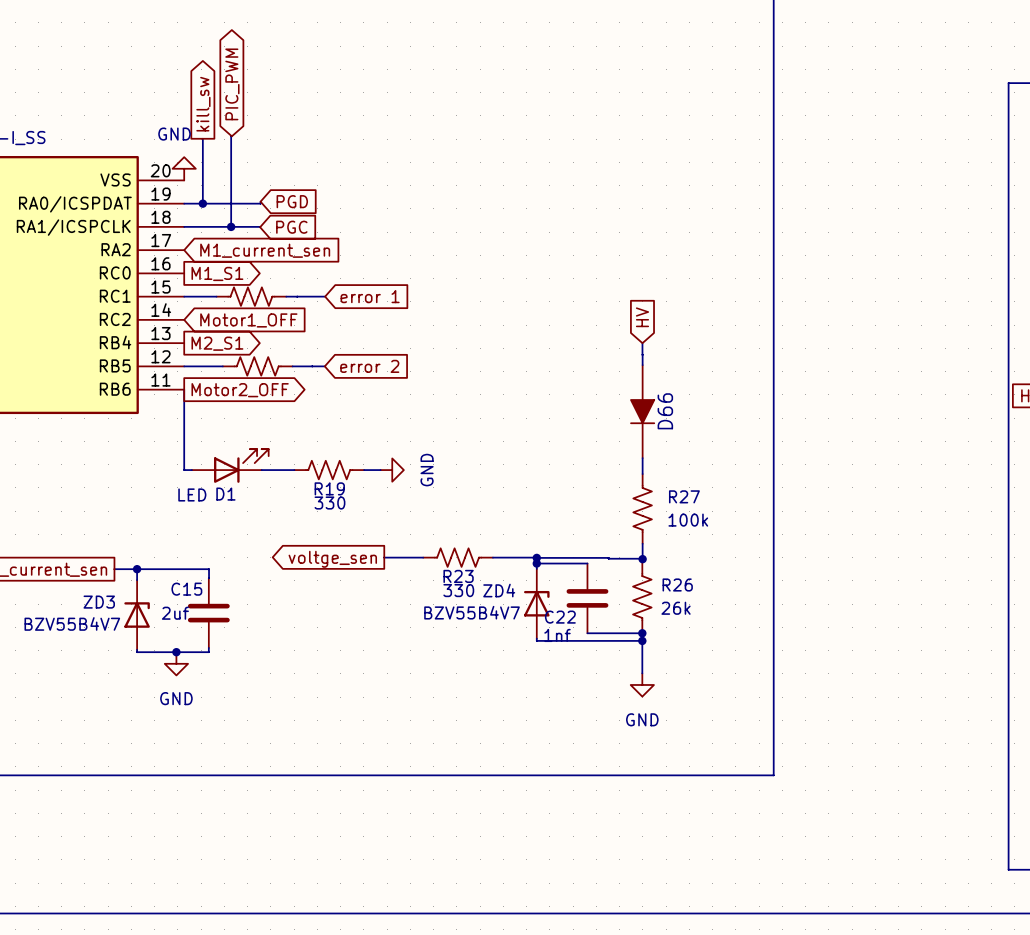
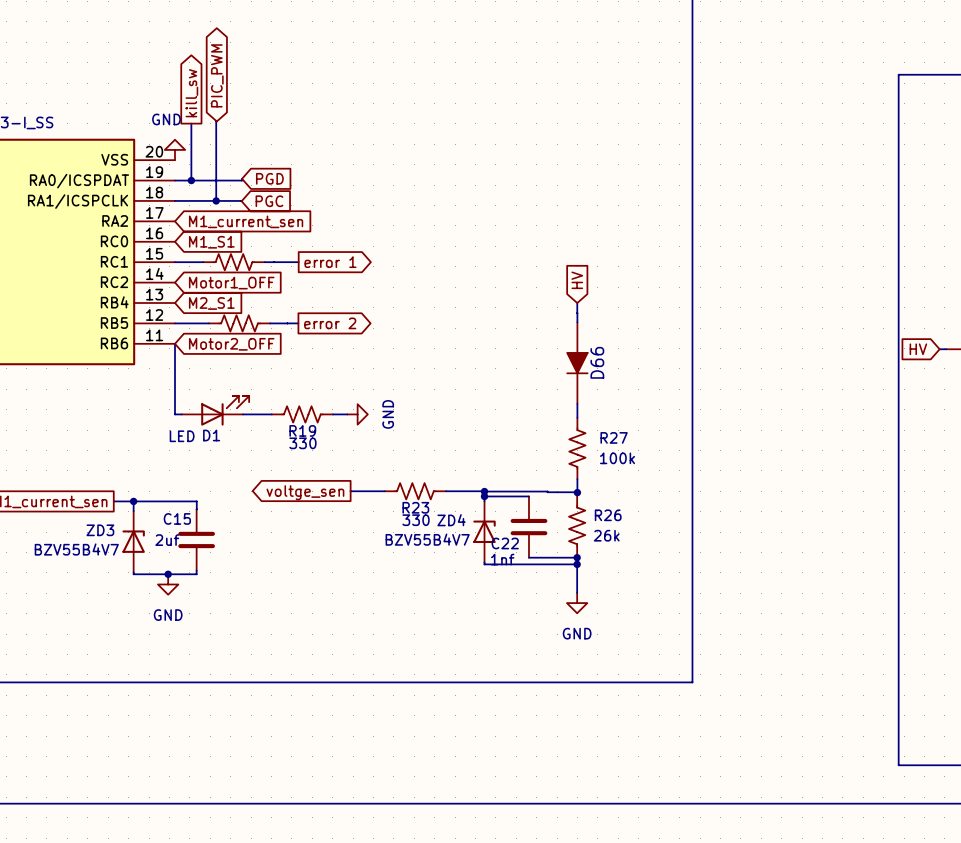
global label shape: output (217, 273) -> input (211, 242)
global label shape: input (370, 296) -> output (330, 262)
global label shape: output (217, 343) -> input (211, 303)
global label shape: input (369, 366) -> output (330, 323)
global label shape: output (240, 390) -> input (231, 344)

